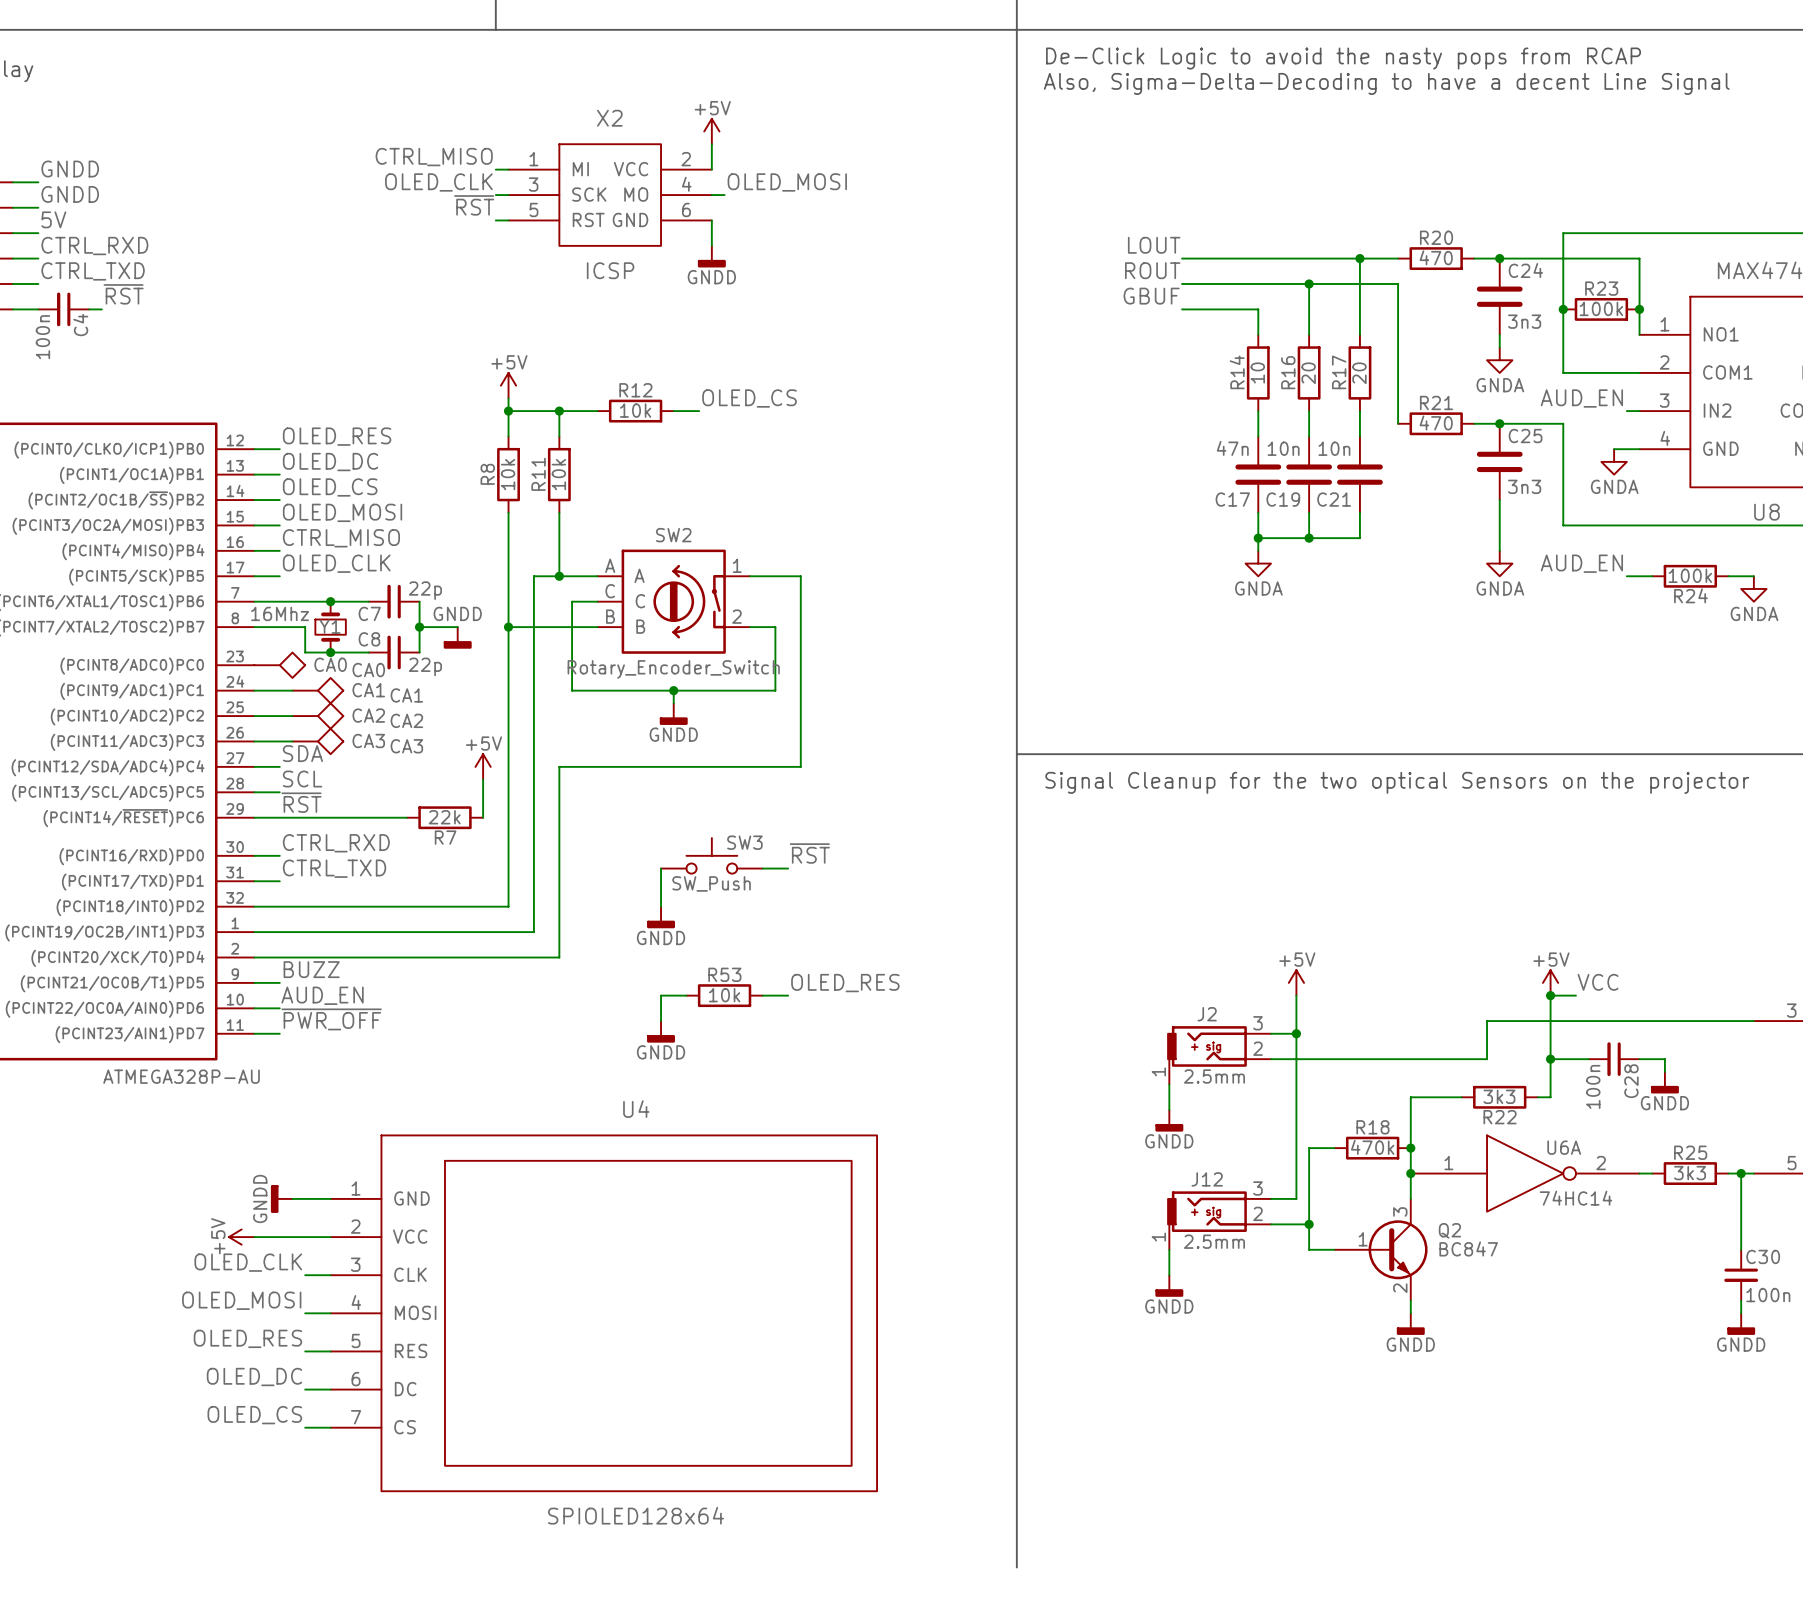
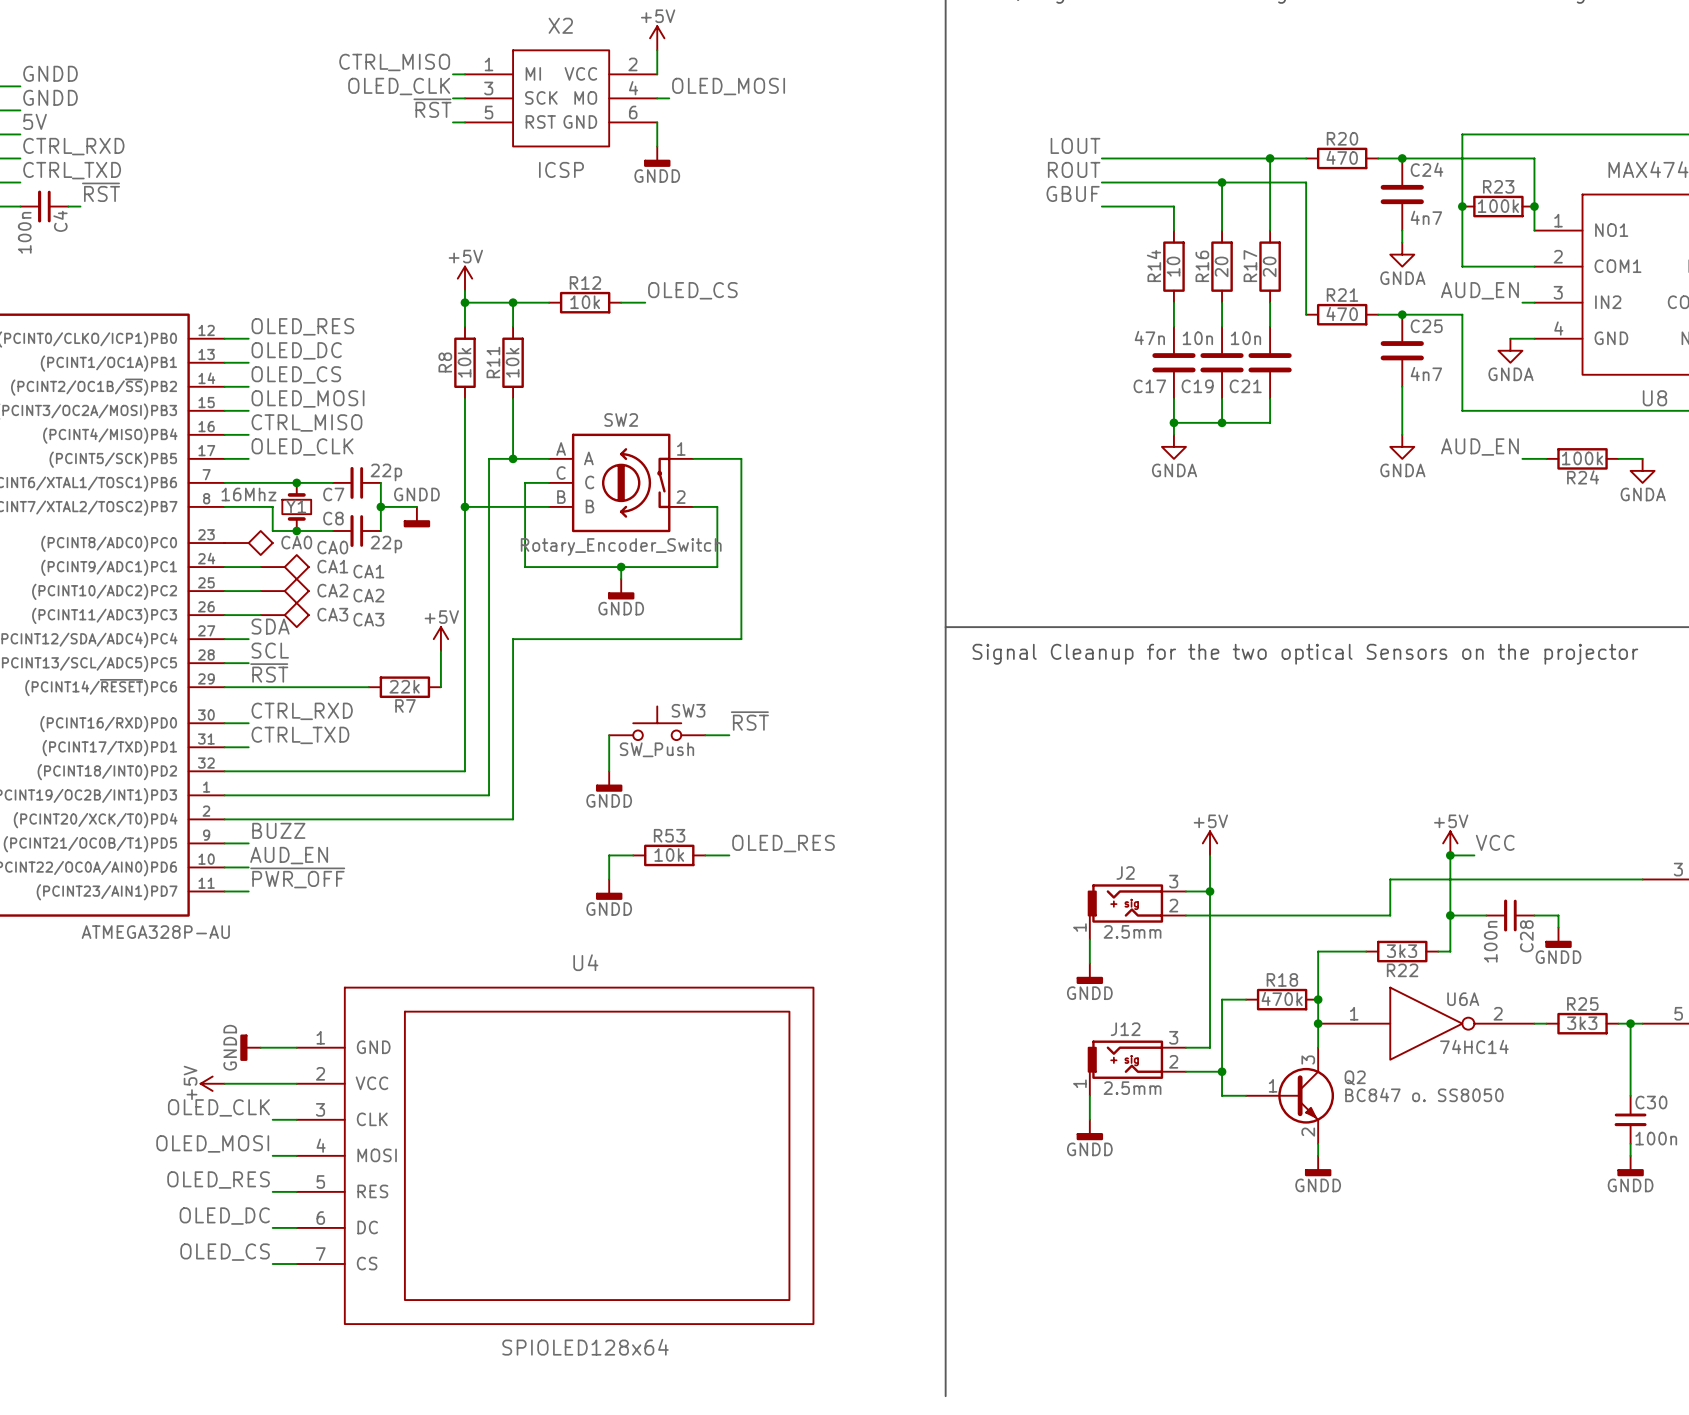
C24 value: 3n3 (1524, 321) -> 4n7 (1426, 217)
C25 value: 3n3 (1524, 486) -> 4n7 (1426, 374)
Q2 value: BC847 (1468, 1249) -> BC847 o. SS8050 (1424, 1095)

